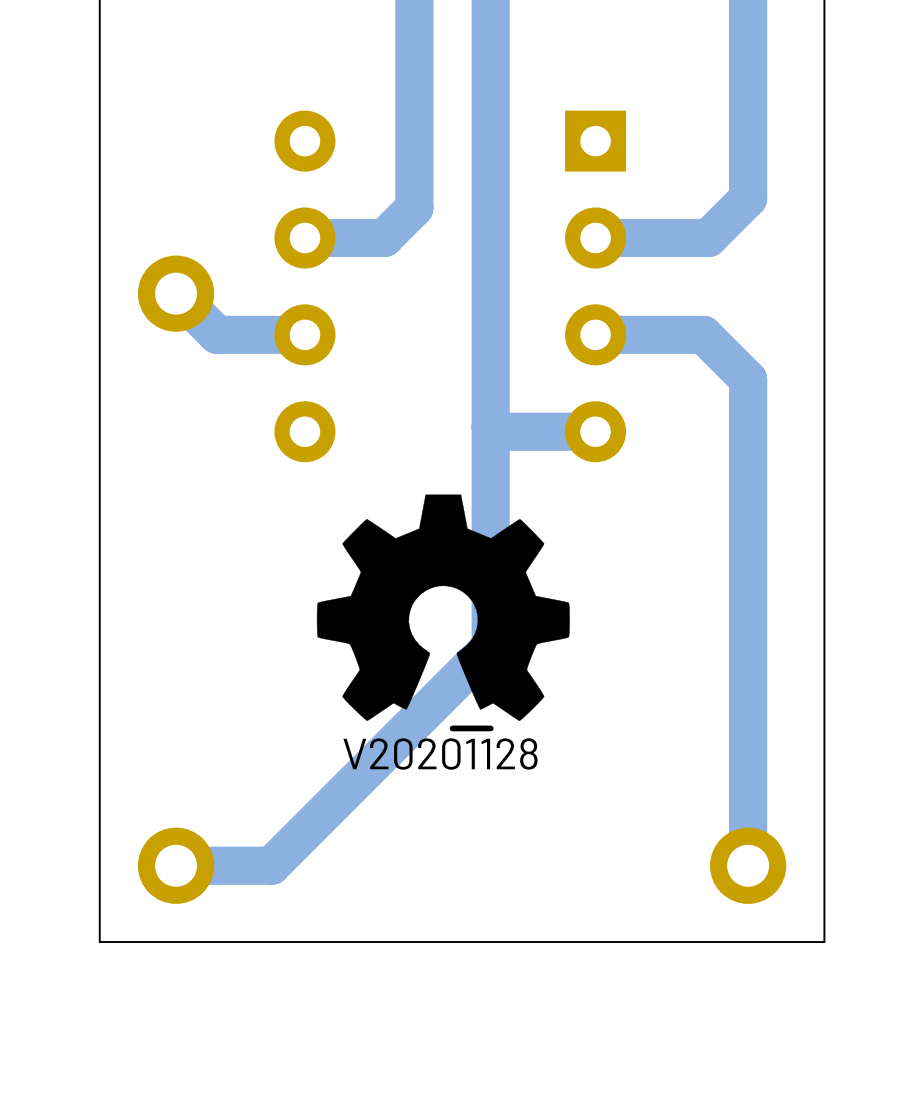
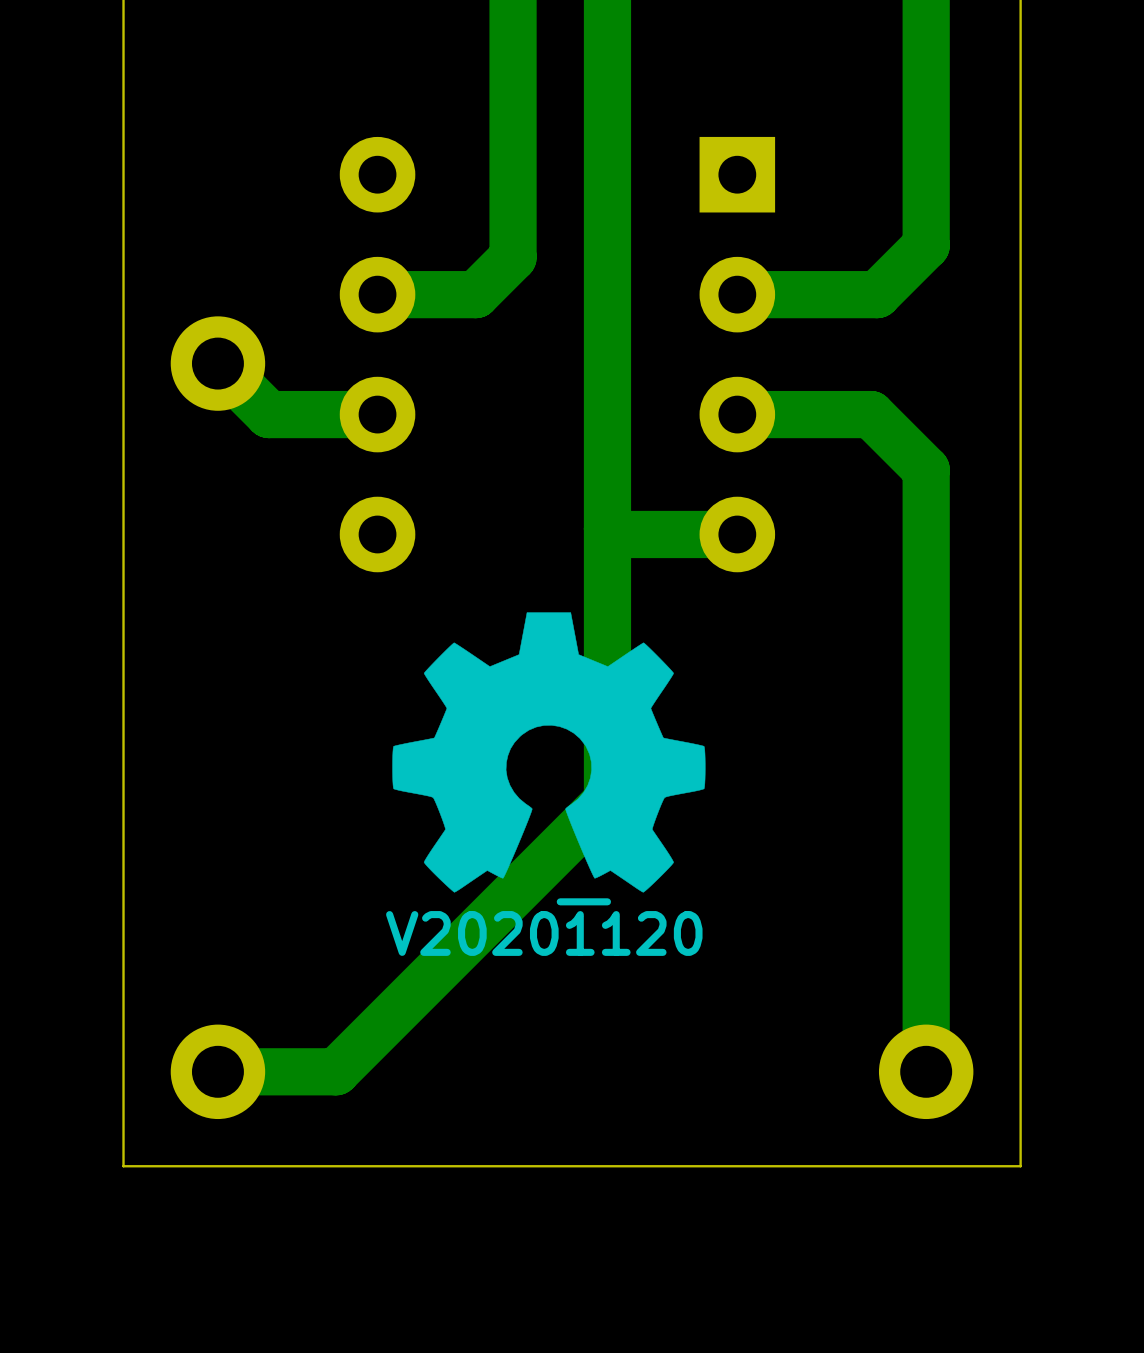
drawing shape: [343, 725, 538, 770] -> [386, 898, 703, 956]

